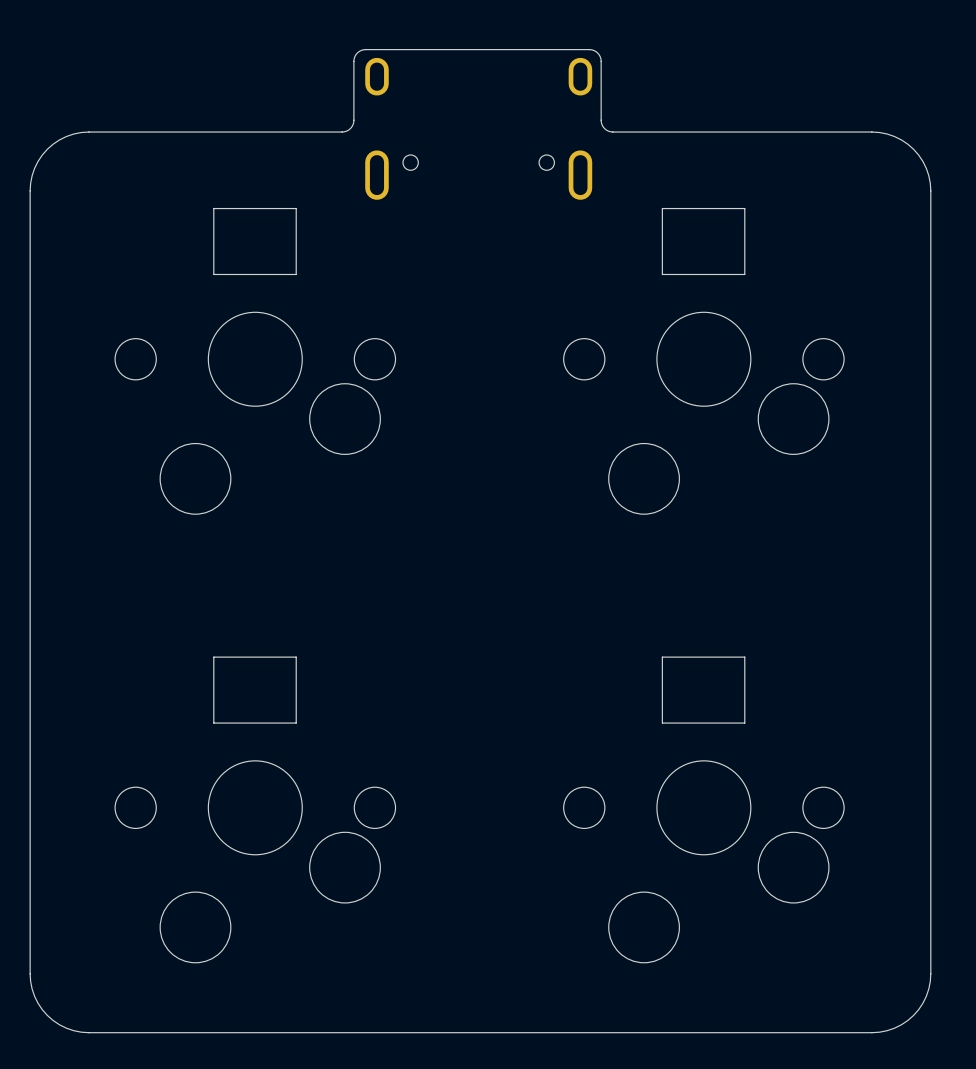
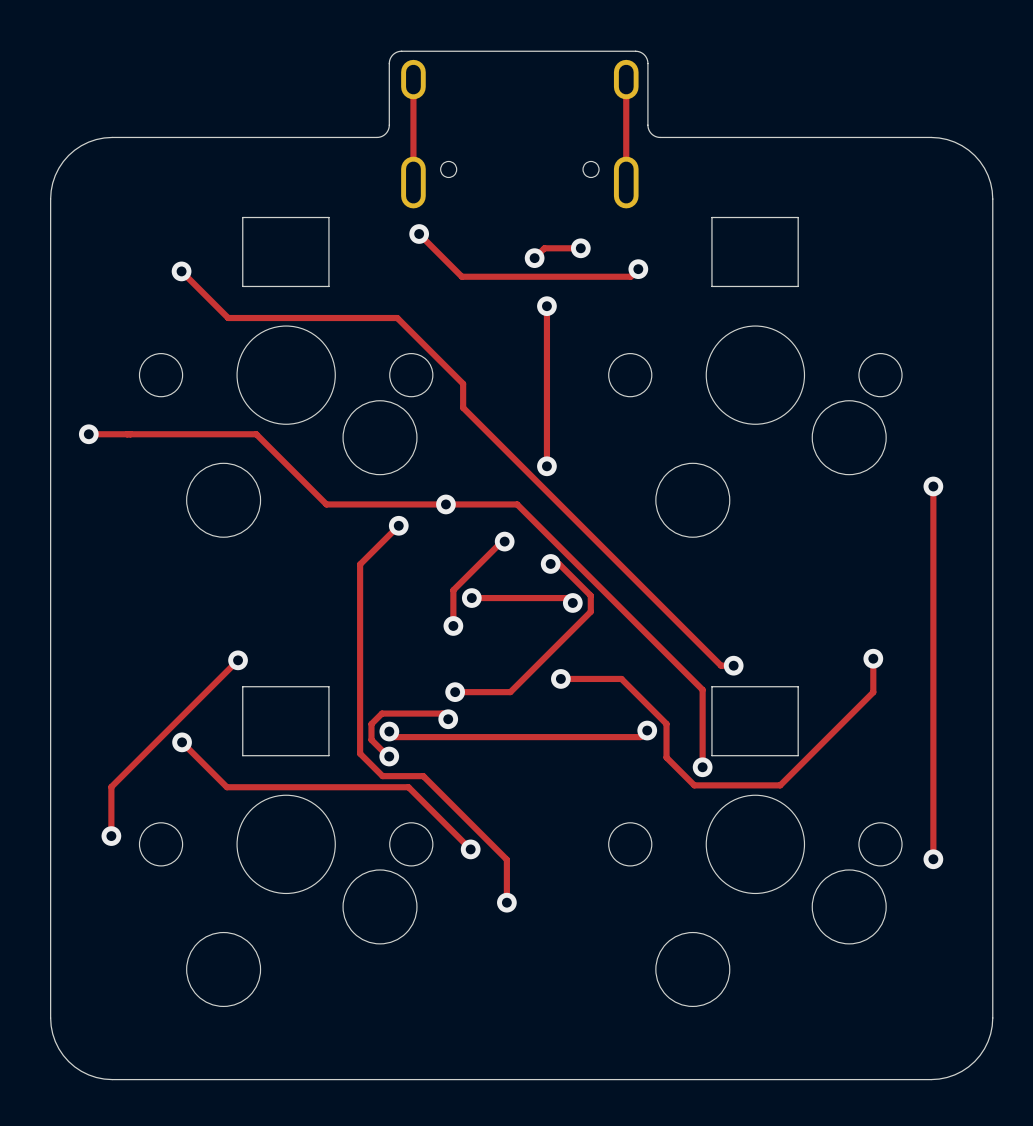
track: none -> (413, 79) (413, 182)
track: none -> (626, 79) (626, 182)
track: none -> (419, 234) (461, 276) (630, 276) (638, 269)
via: none -> (419, 234)
track: none -> (580, 248) (544, 248) (534, 258)
via: none -> (580, 248)
via: none -> (534, 258)
via: none -> (638, 269)
track: none -> (181, 271) (228, 318) (397, 318) (463, 383) (463, 407) (721, 665) (733, 665)
via: none -> (181, 271)
track: none -> (546, 306) (546, 466)
via: none -> (546, 306)
track: none -> (88, 434) (256, 434) (326, 504) (517, 504) (702, 689) (702, 767)
via: none -> (88, 434)
via: none -> (546, 466)
track: none -> (933, 486) (933, 859)
via: none -> (933, 486)
via: none -> (445, 504)
track: none -> (398, 525) (360, 564) (360, 753) (382, 776) (423, 776) (506, 859) (506, 902)
via: none -> (398, 525)
track: none -> (504, 541) (502, 541) (453, 590) (453, 625)
via: none -> (504, 541)
track: none -> (550, 563) (559, 563) (590, 595) (590, 611) (510, 692) (455, 692)
via: none -> (550, 563)
track: none -> (471, 598) (567, 598) (572, 602)
via: none -> (471, 598)
via: none -> (572, 602)
via: none -> (453, 625)
track: none -> (873, 658) (873, 692) (780, 785) (694, 785) (666, 757) (666, 723) (621, 678) (560, 678)
via: none -> (873, 658)
track: none -> (238, 660) (111, 787) (111, 836)
via: none -> (238, 660)
via: none -> (733, 665)
via: none -> (560, 678)
via: none -> (455, 692)
track: none -> (448, 719) (442, 713) (381, 713) (371, 724) (371, 739) (389, 756)
via: none -> (448, 719)
via: none -> (389, 731)
track: none -> (647, 730) (640, 737) (394, 737) (389, 731)
via: none -> (647, 730)
track: none -> (182, 742) (226, 787) (408, 787) (470, 849)
via: none -> (182, 742)
via: none -> (389, 756)
via: none -> (702, 767)
via: none -> (111, 836)
via: none -> (470, 849)
via: none -> (933, 859)
via: none -> (506, 902)

